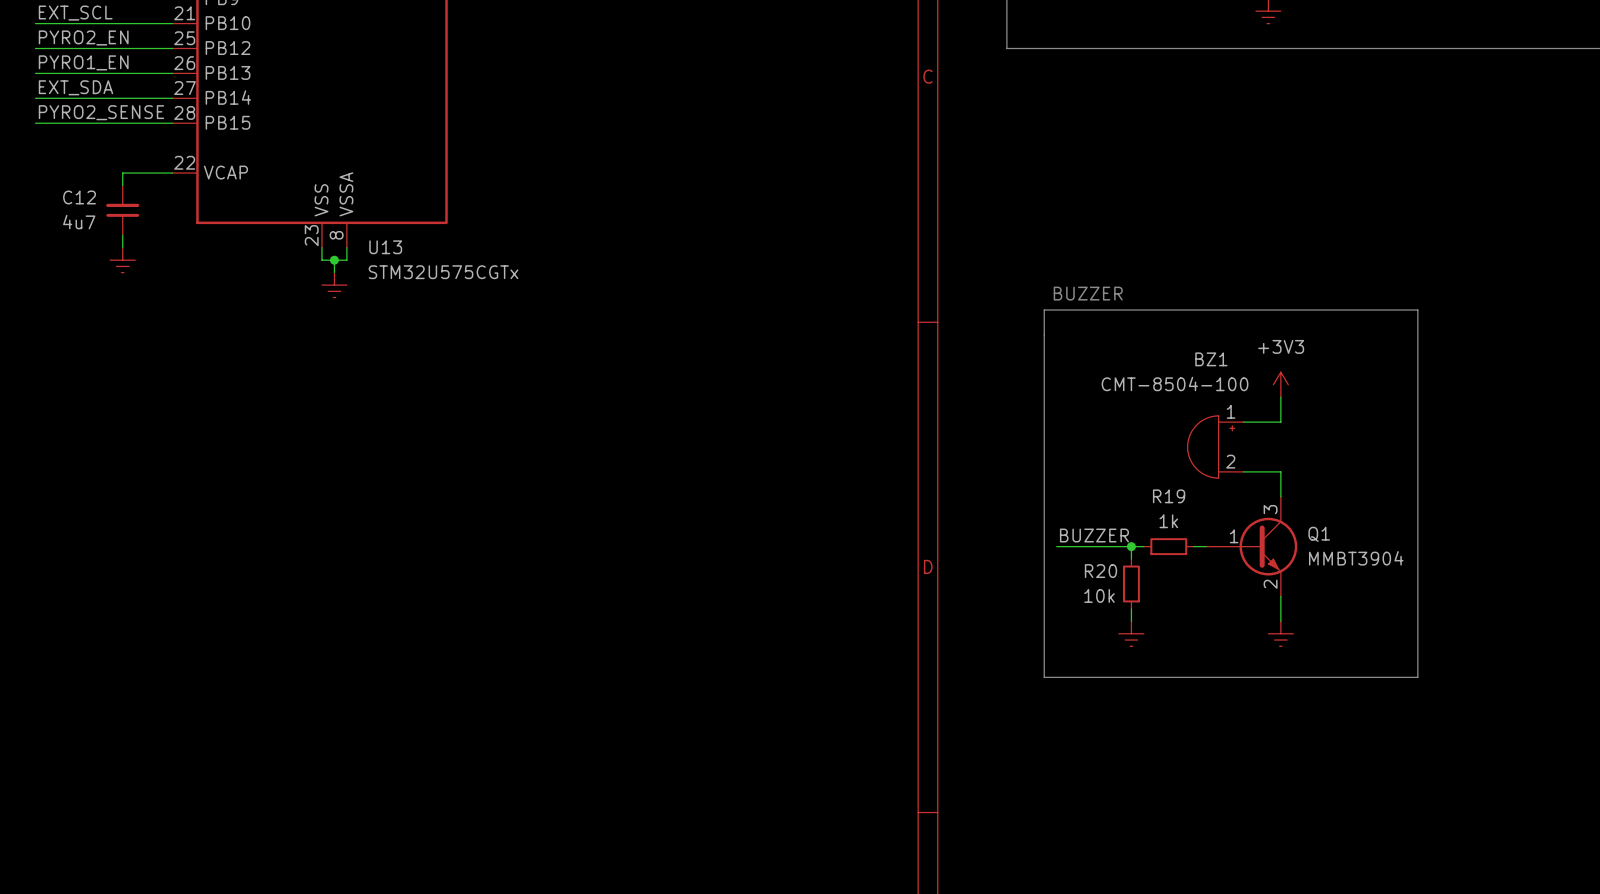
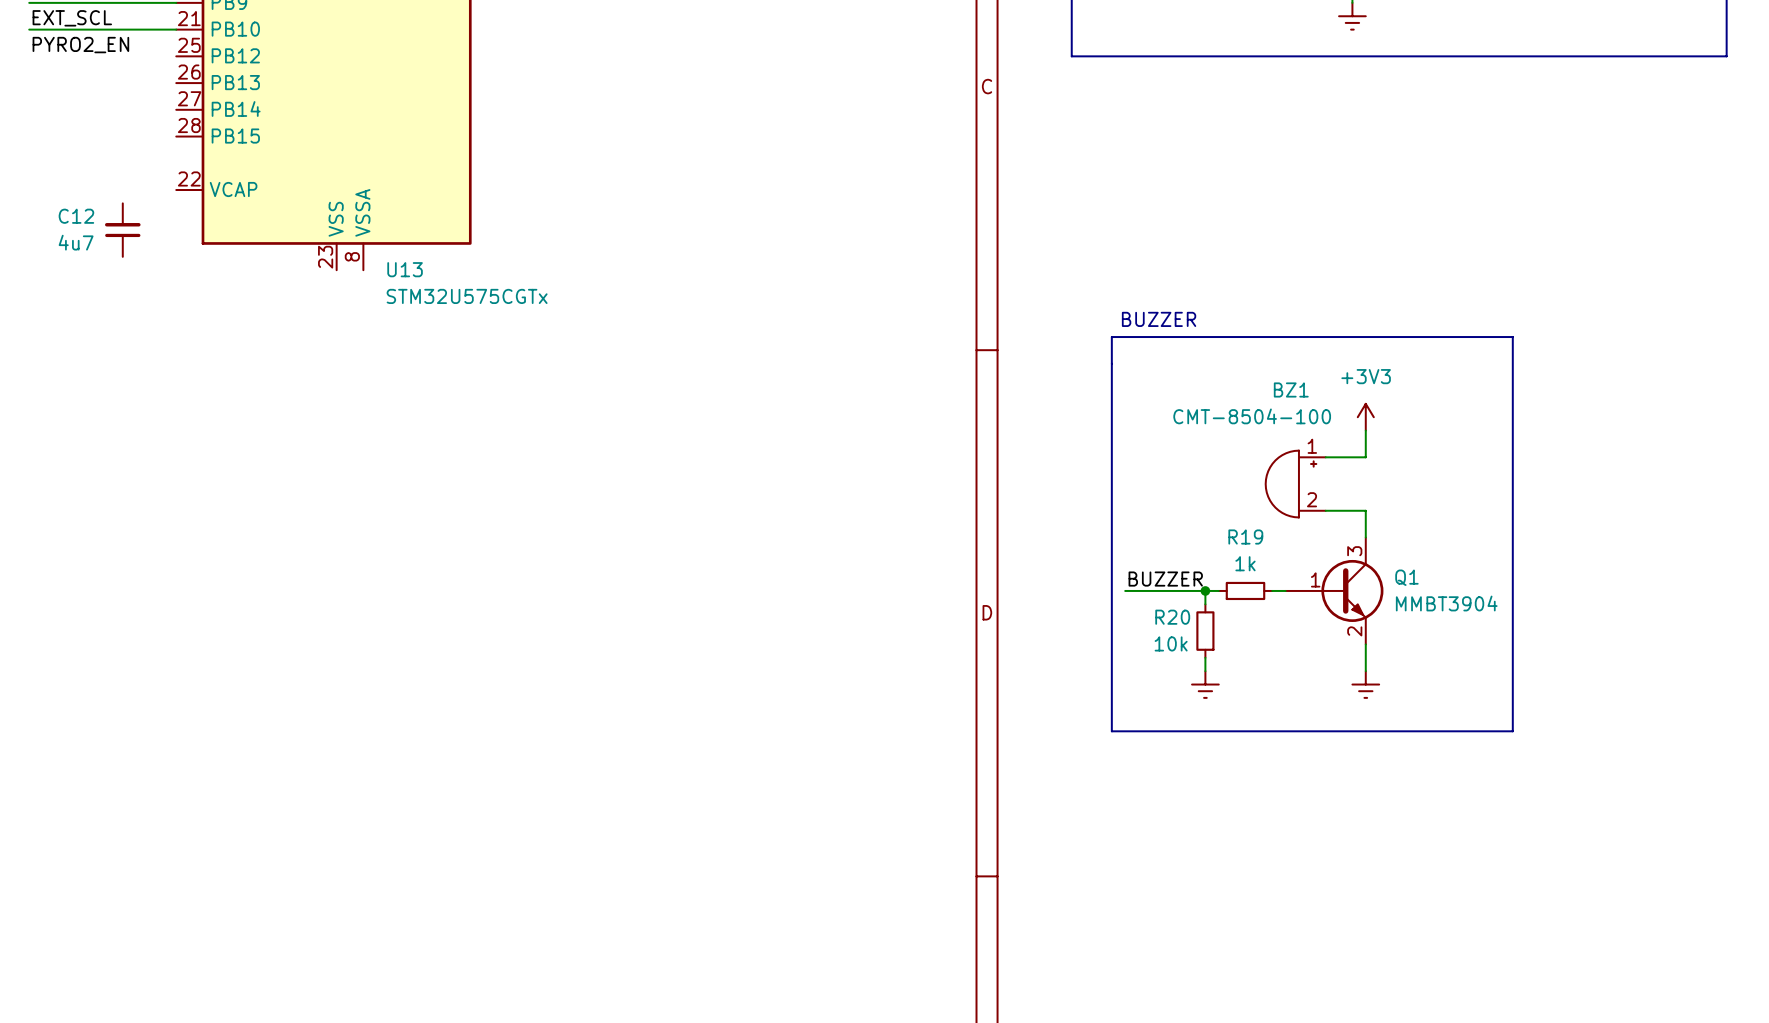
wire: (35, 48) (172, 48) -> none
label: PYRO1_EN (83, 62) -> none
wire: (35, 73) (172, 73) -> none
label: EXT_SDA (75, 87) -> none
wire: (35, 98) (172, 98) -> none
label: PYRO2_SENSE (101, 112) -> none
wire: (35, 123) (172, 123) -> none
wire: (172, 173) (122, 173) (122, 185) -> none
wire: (122, 235) (122, 247) -> none
wire: (321, 247) (321, 260) (346, 260) (346, 247) -> none
power symbol: (122, 260) -> none
wire: (334, 260) (334, 272) -> none
junction: (334, 260) -> none
power symbol: (334, 285) -> none

